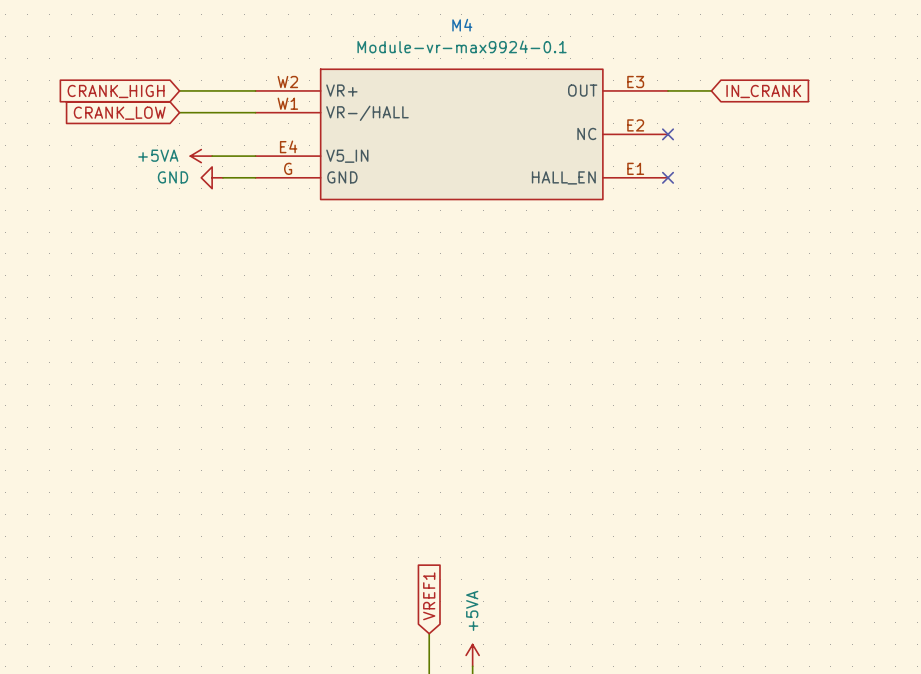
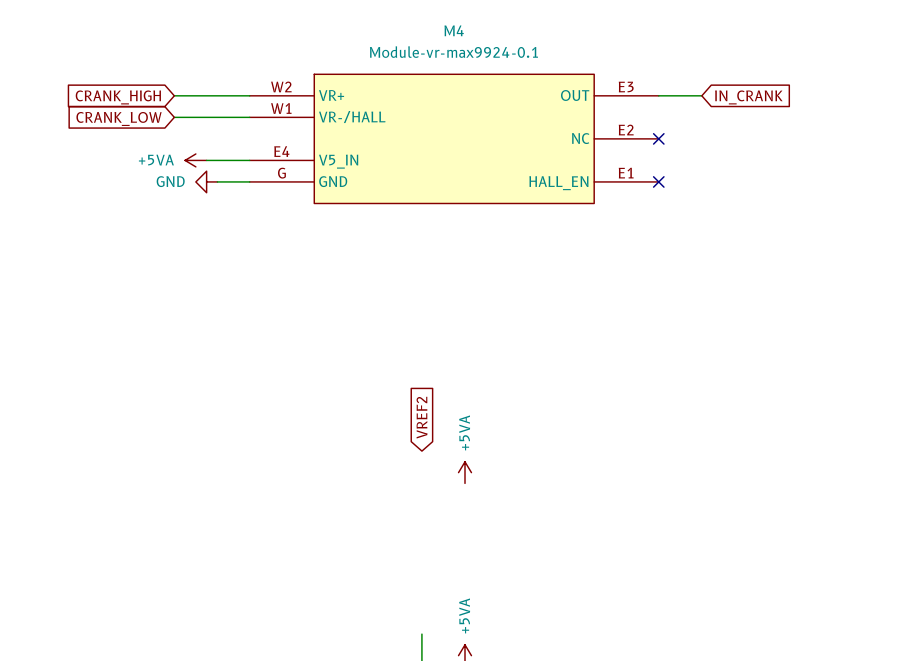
global label: none -> VREF2 (422, 417)
power symbol: none -> +5VA (465, 472)
global label: VREF1 (429, 596) -> none

